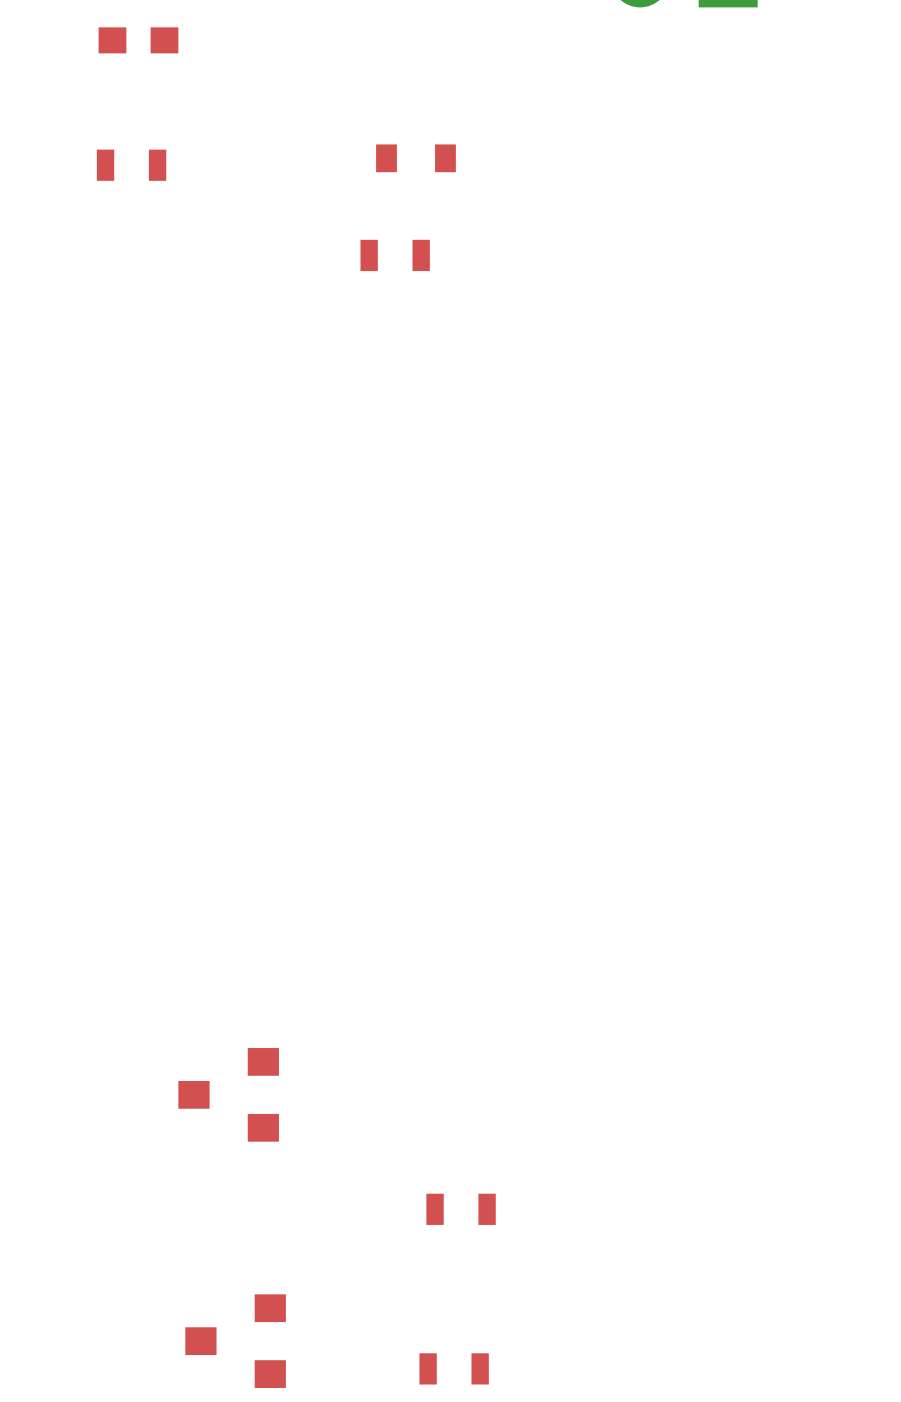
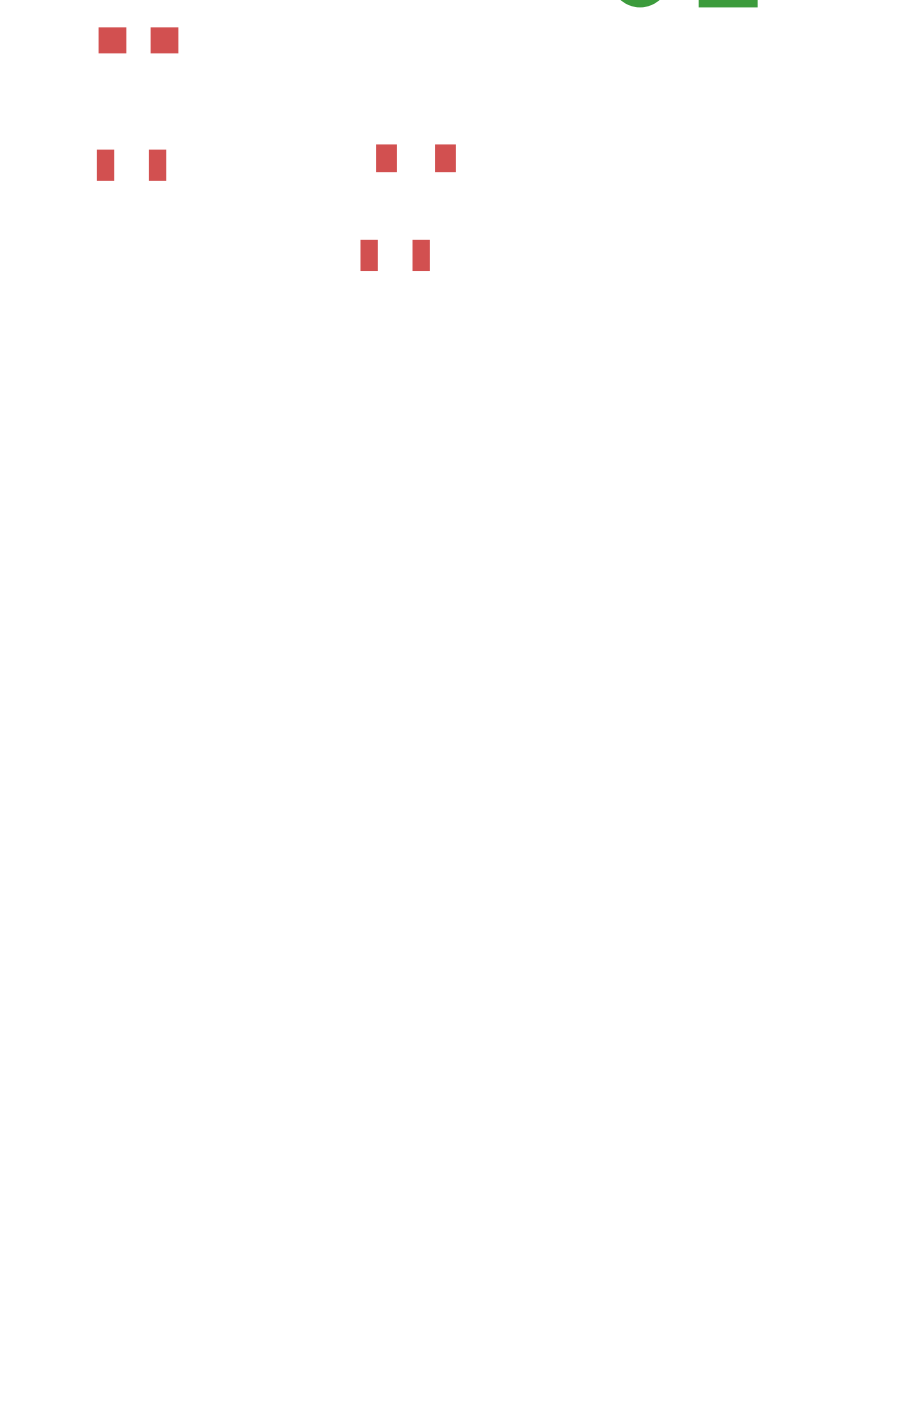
part: (228, 1094) -> none
part: (461, 1209) -> none
part: (235, 1341) -> none
part: (454, 1368) -> none

